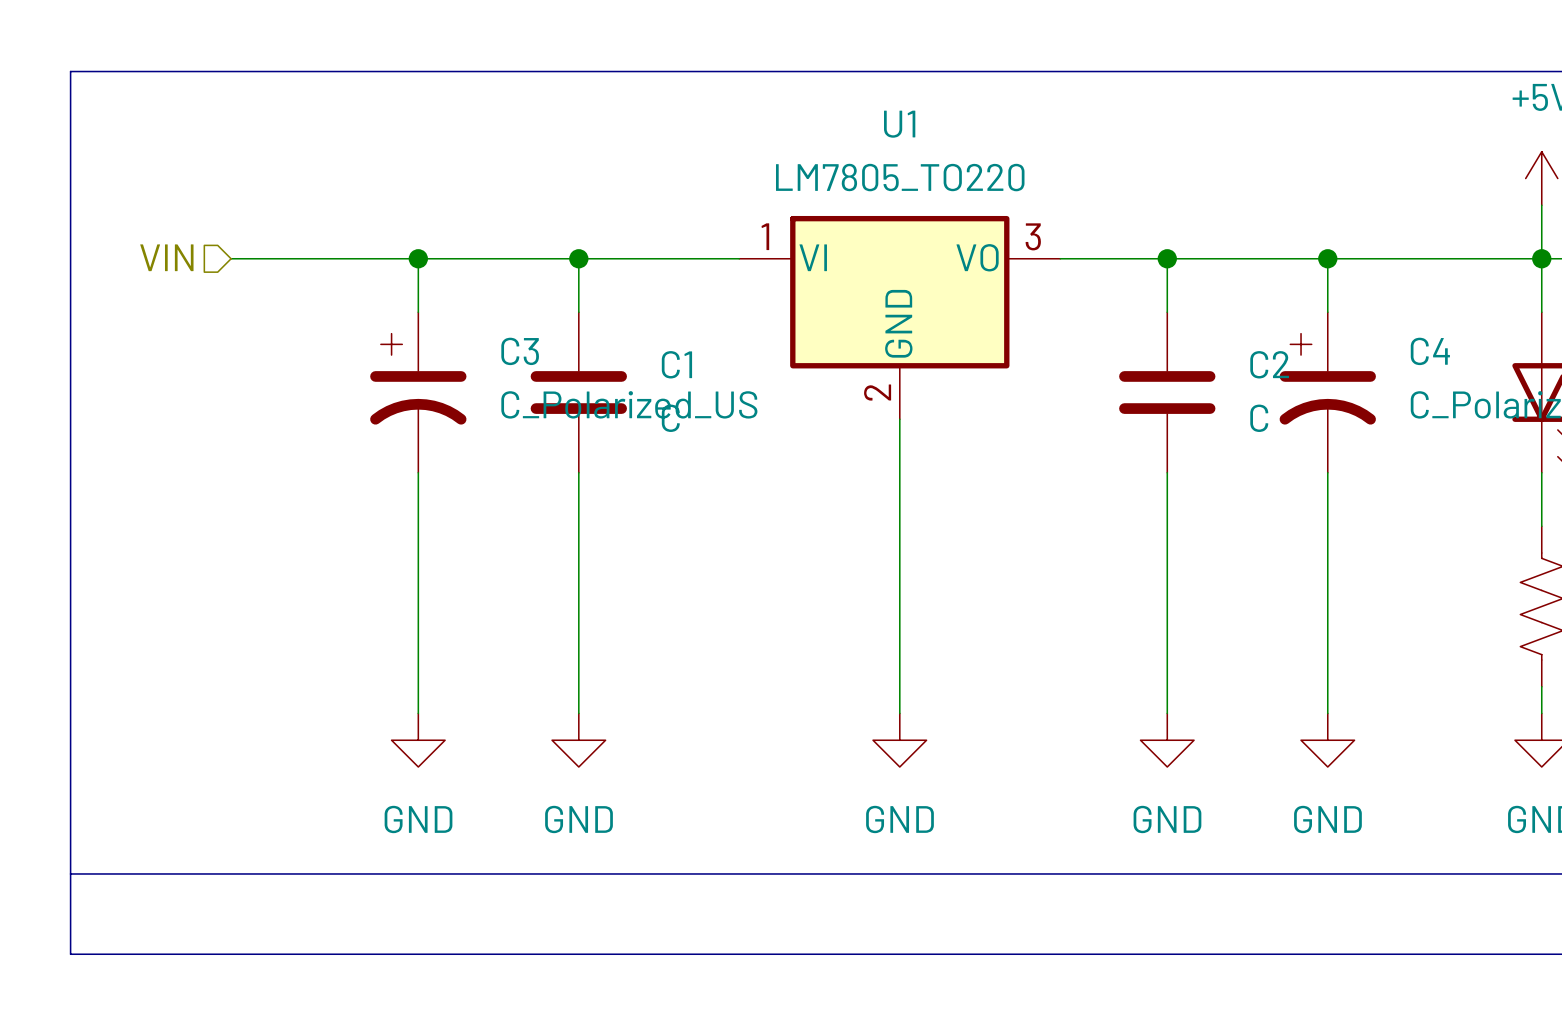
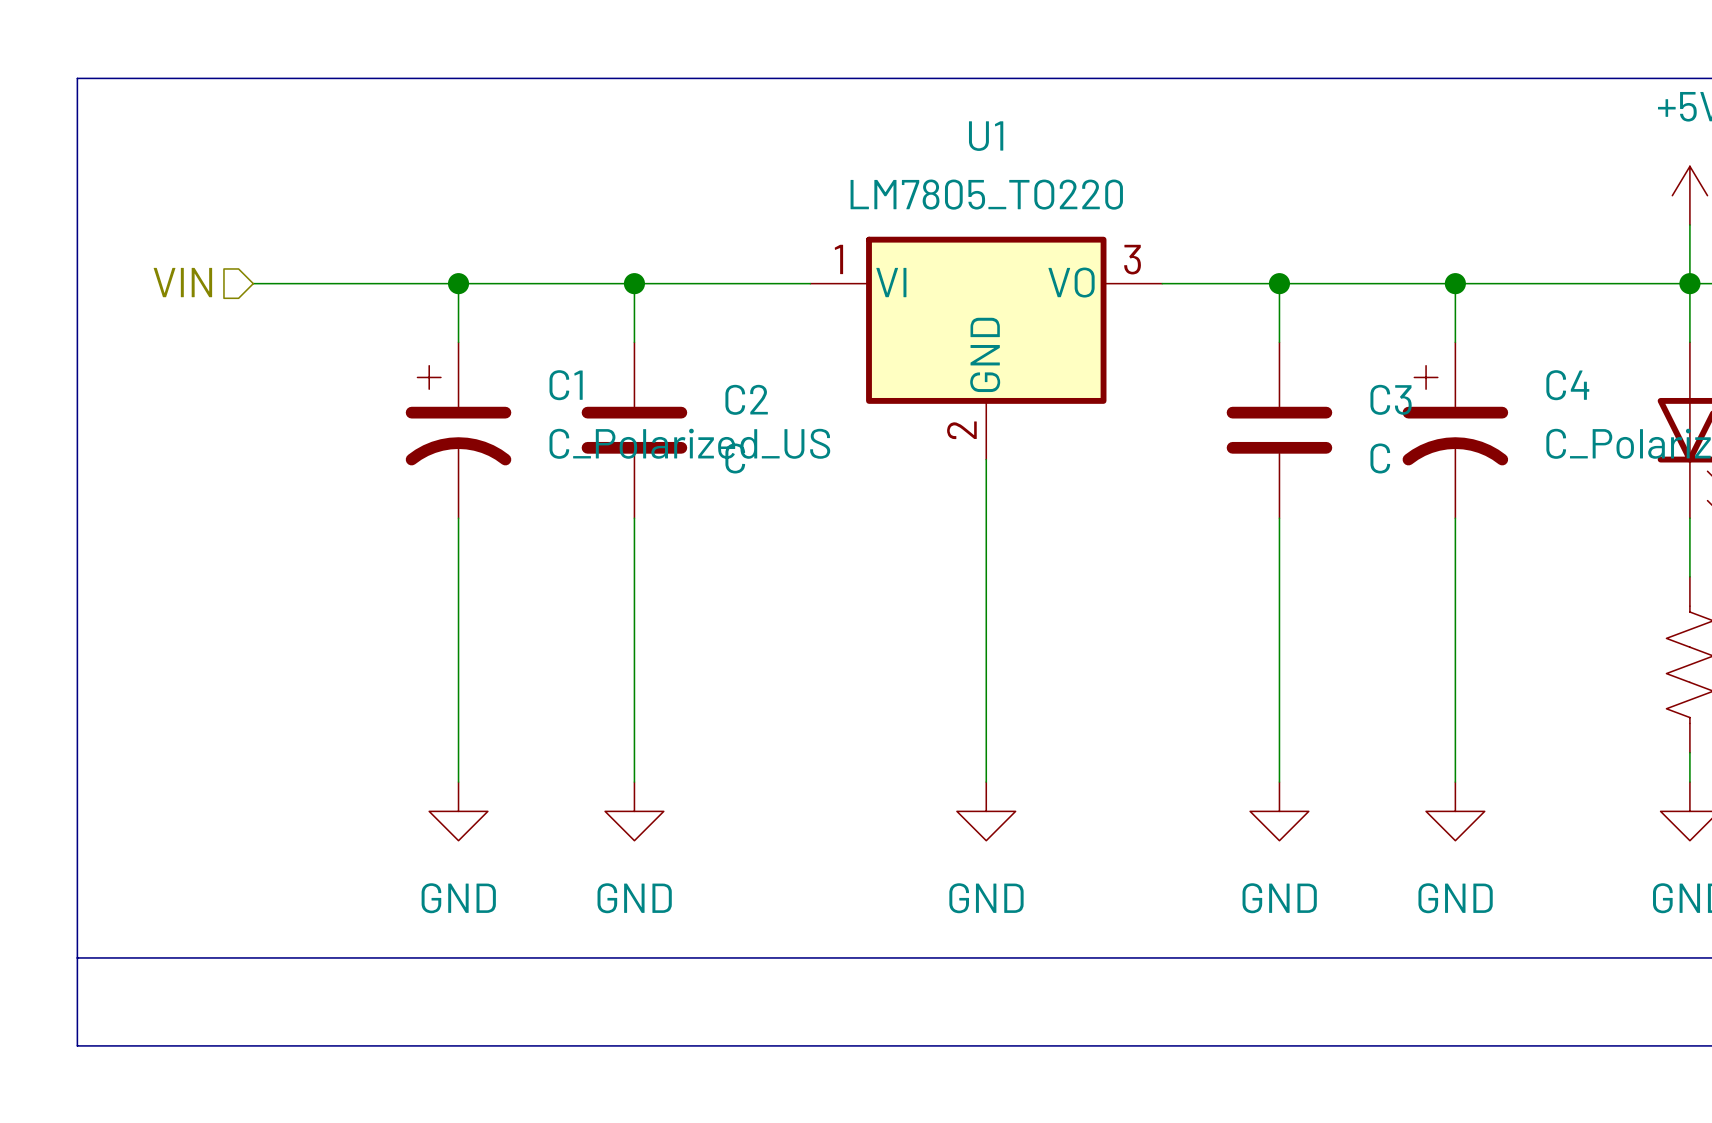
C3 name: C3 (520, 351) -> C1 (566, 385)
C1 name: C1 (676, 364) -> C2 (746, 399)
C2 name: C2 (1269, 364) -> C3 (1391, 399)

